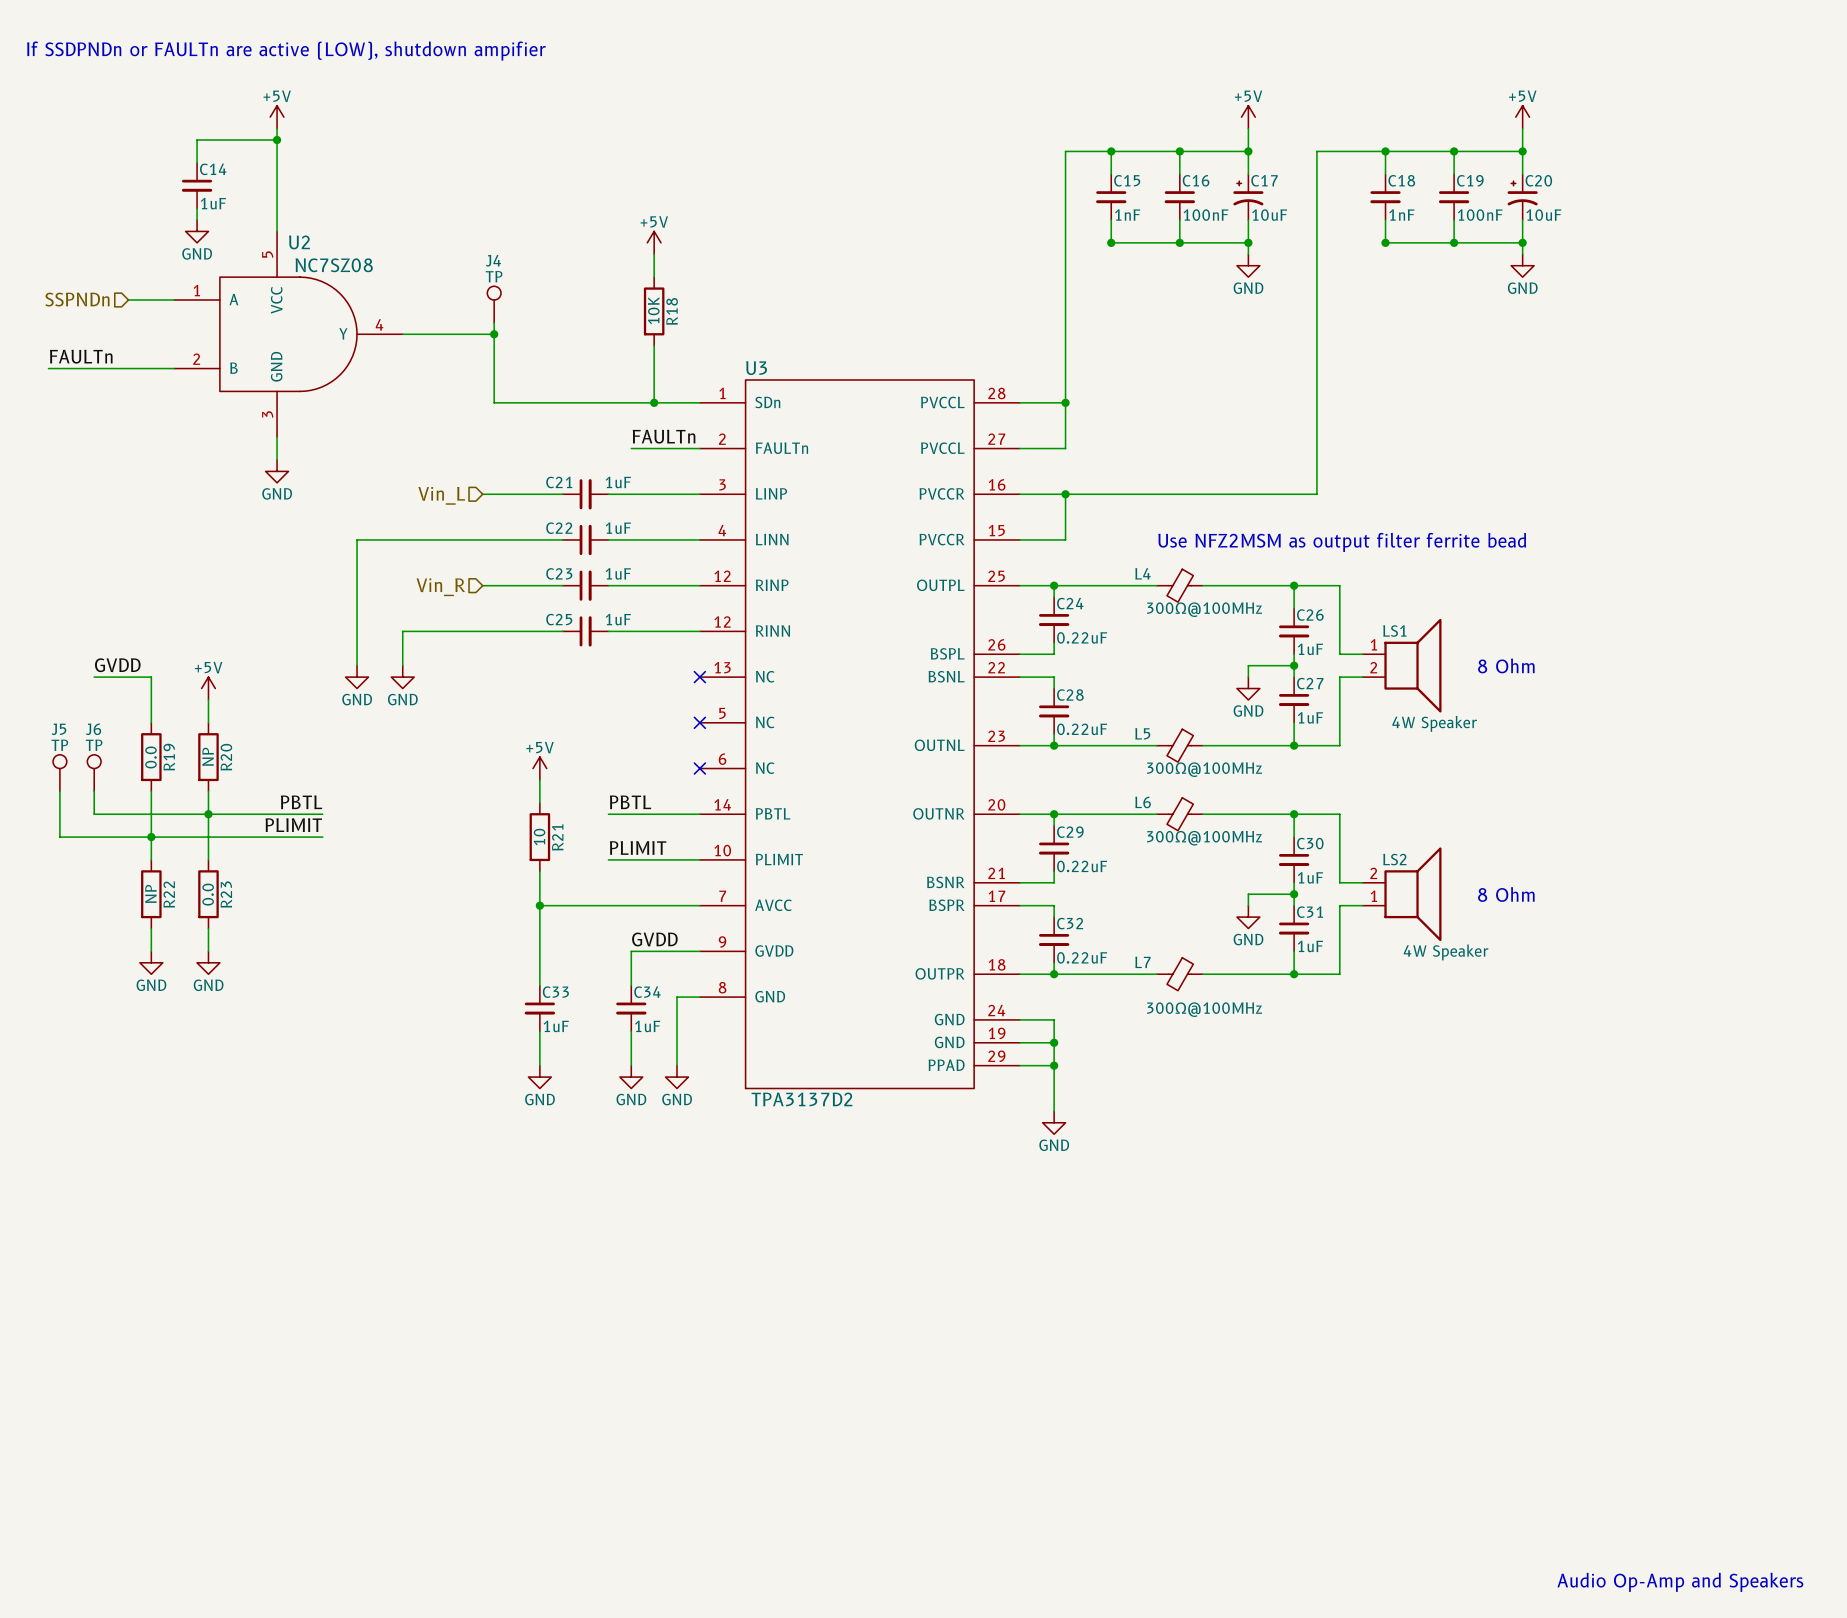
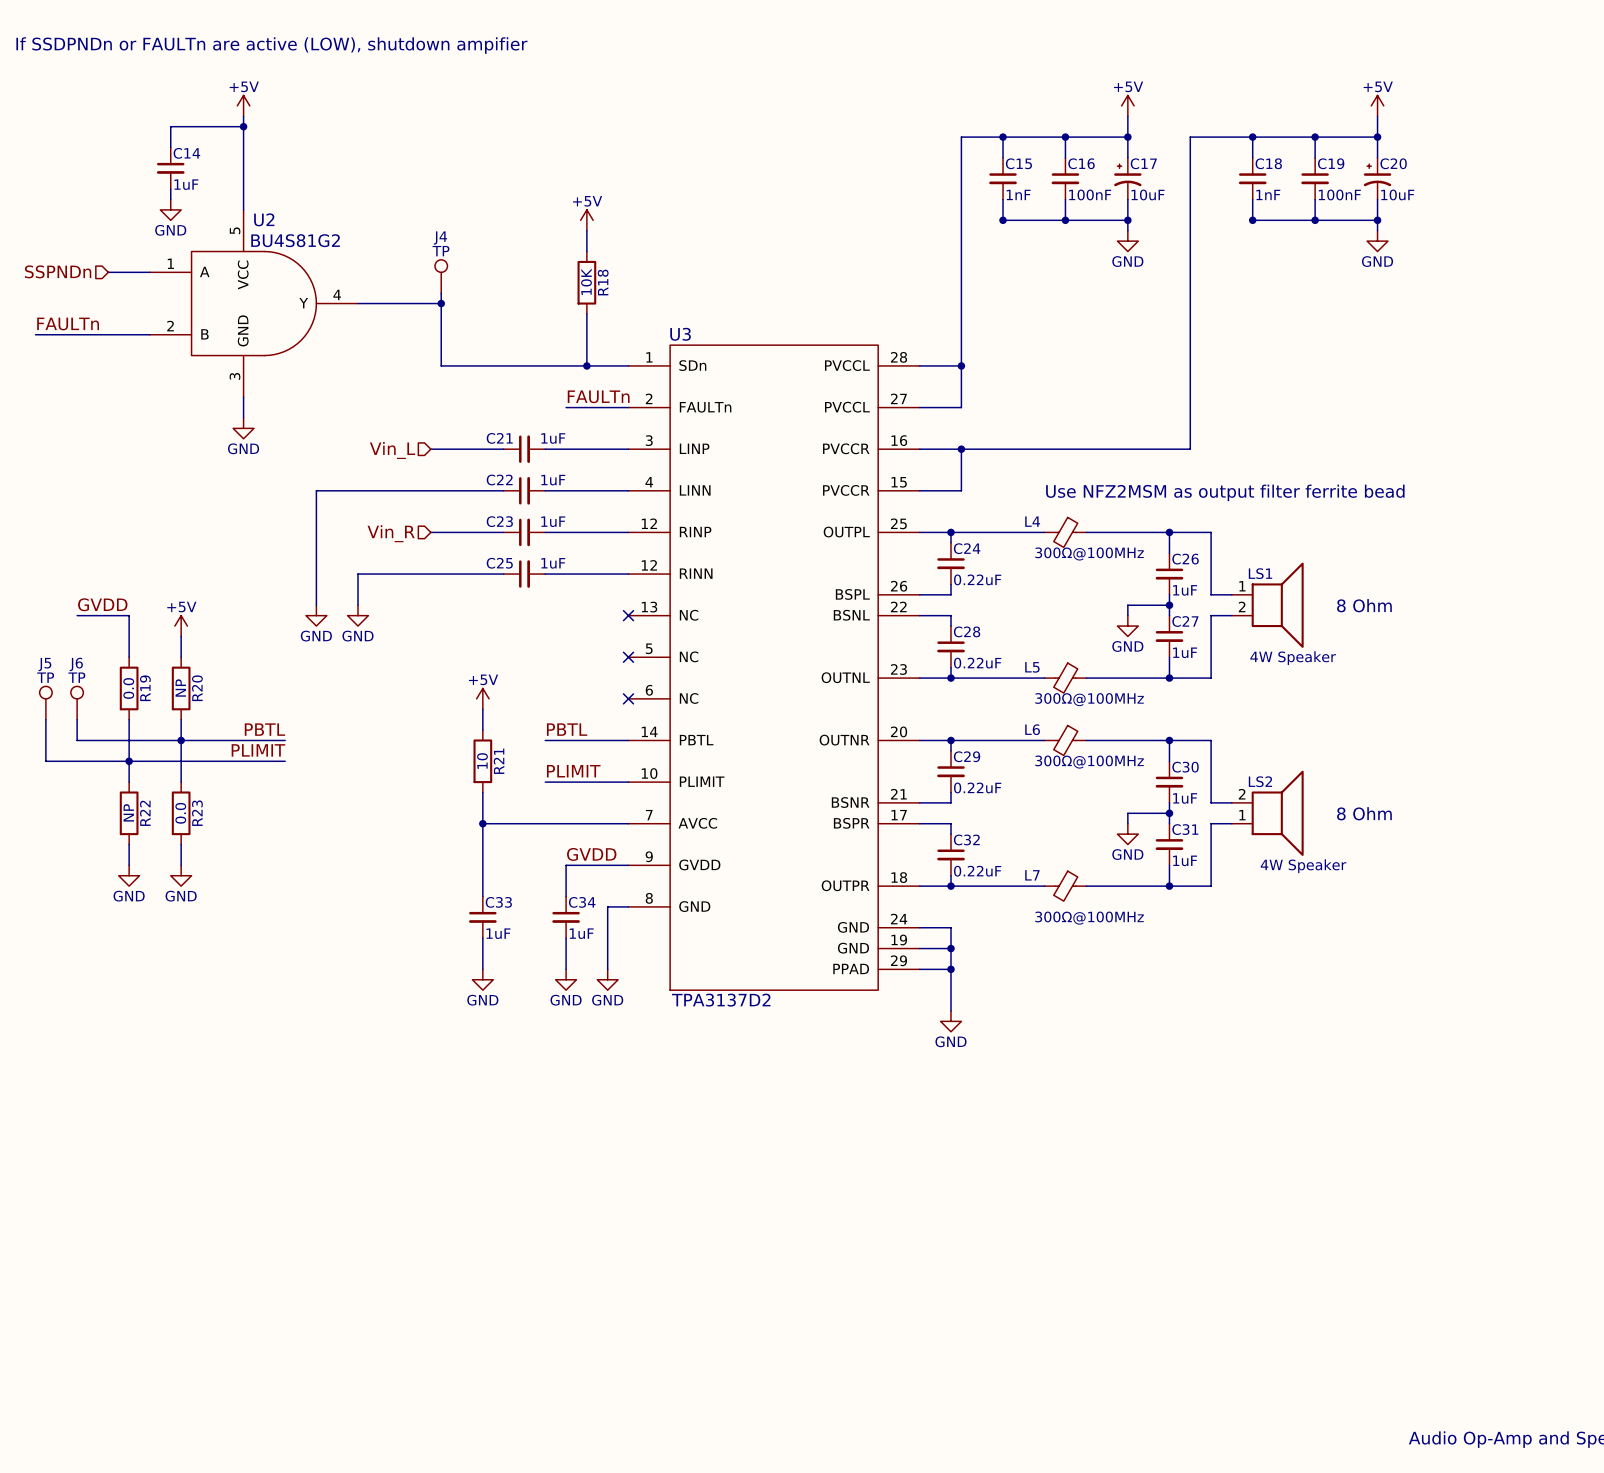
U2 value: NC7SZ08 (334, 265) -> BU4S81G2 (295, 240)

